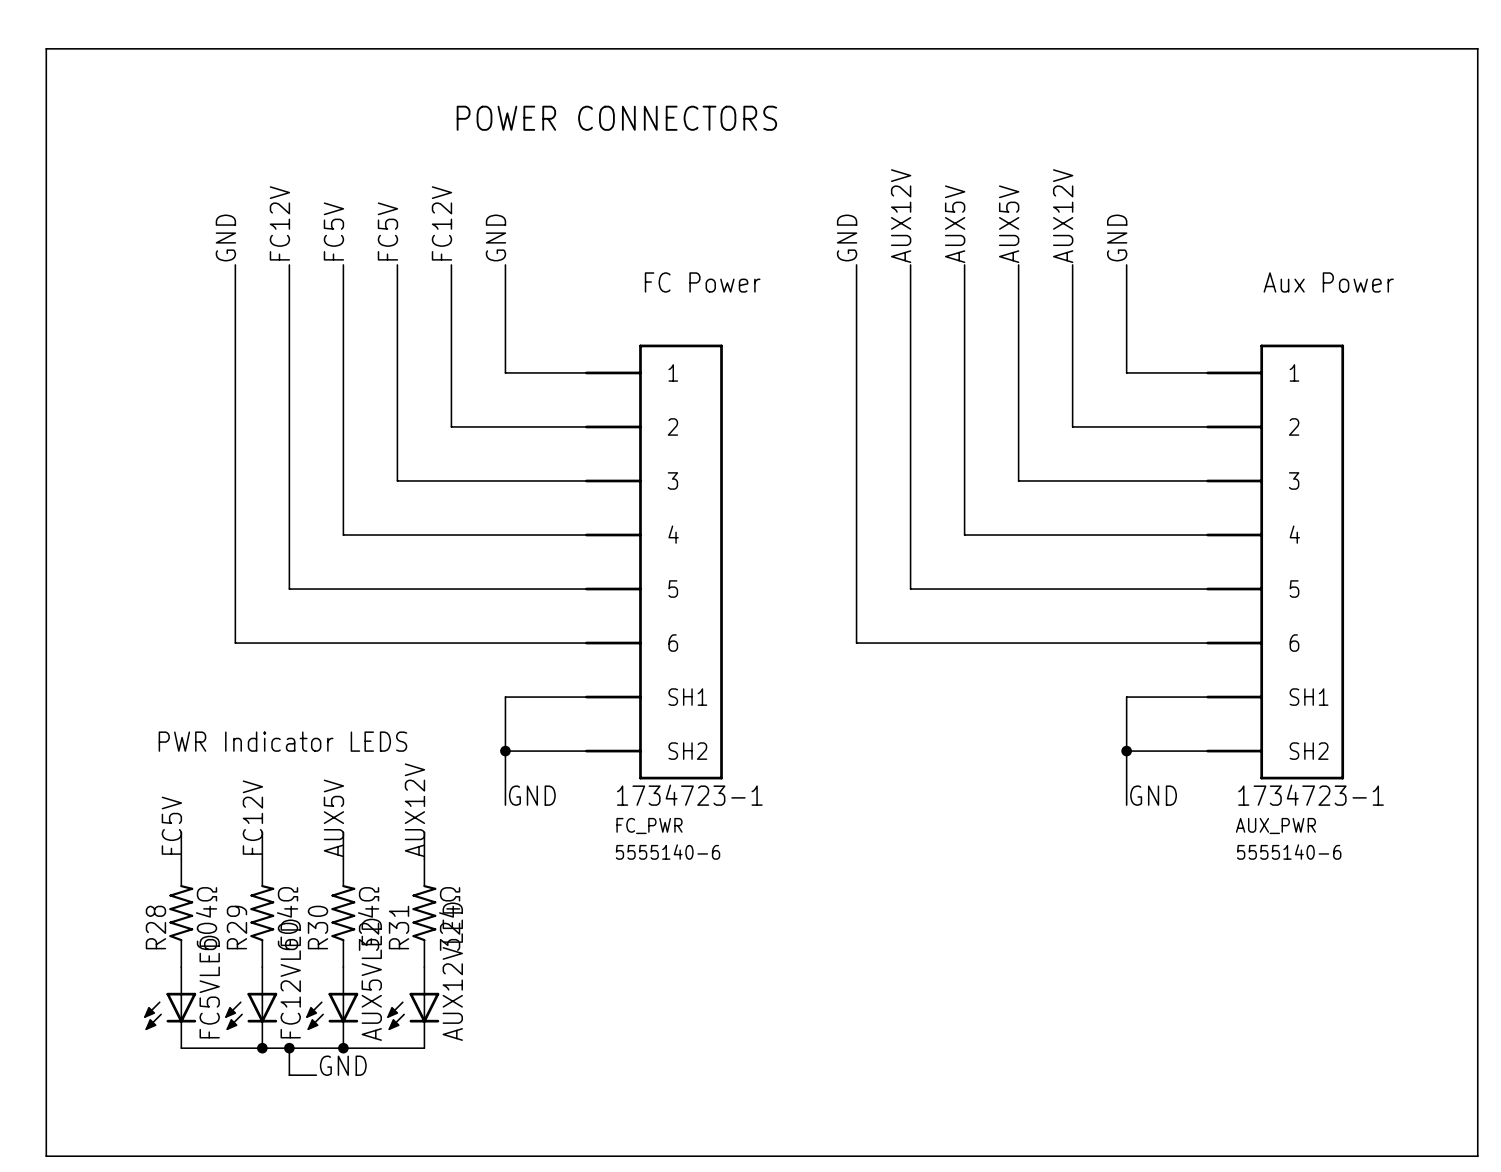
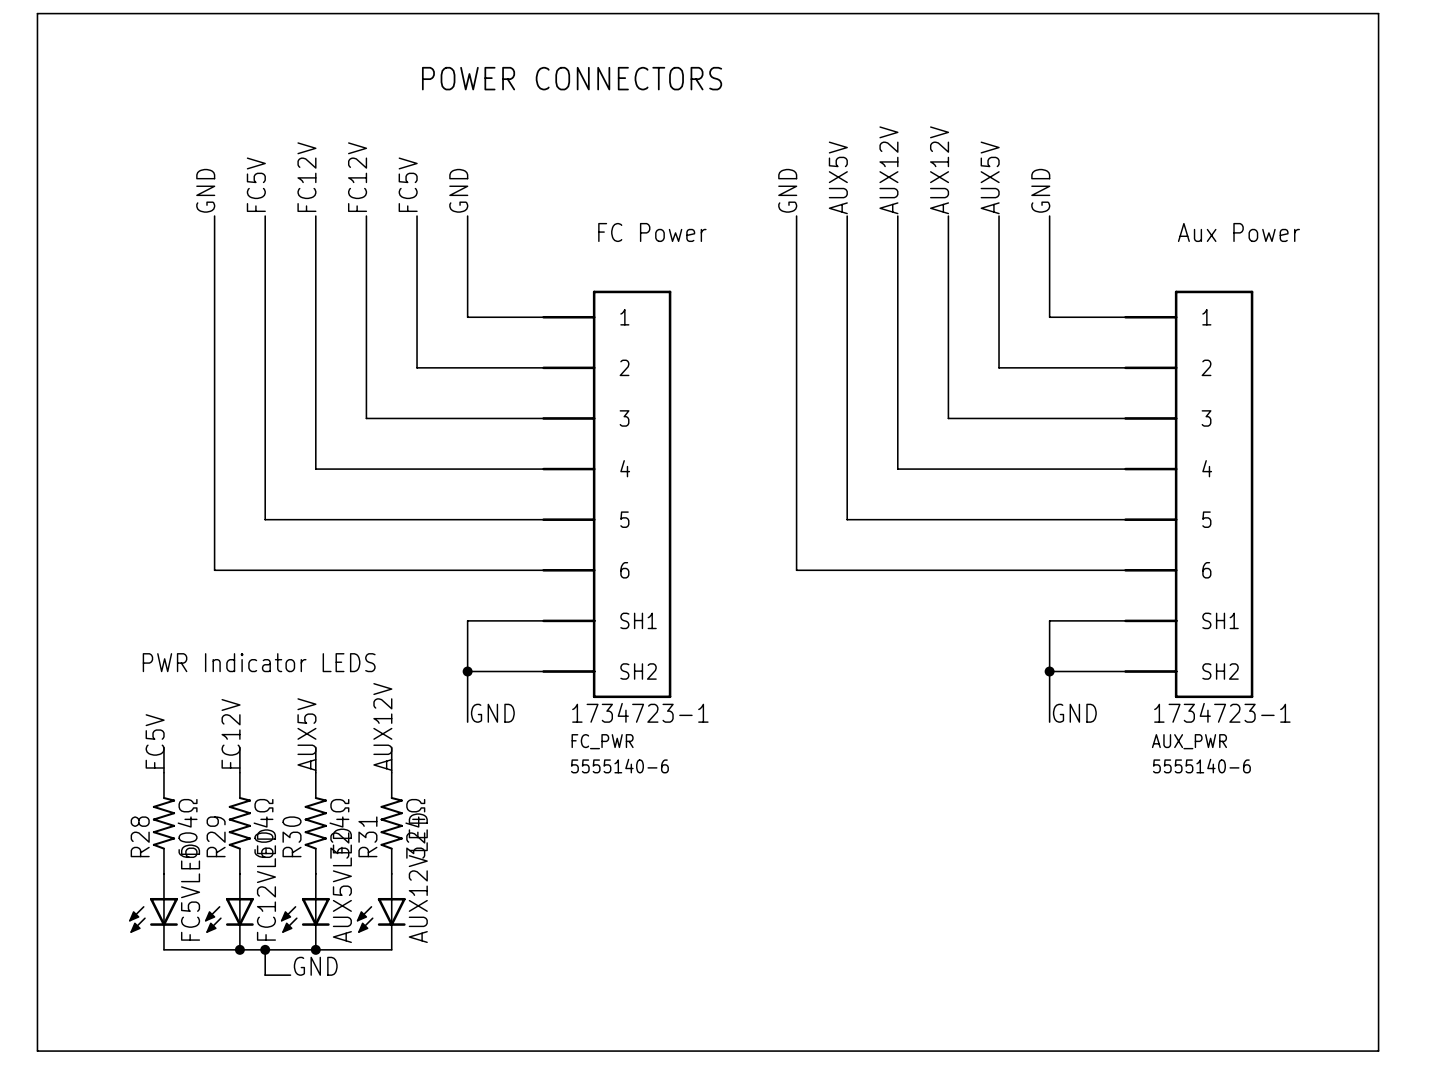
label: AUX12V (901, 216) -> AUX5V (838, 177)
label: AUX12V (1063, 216) -> AUX5V (990, 177)
label: FC12V (279, 223) -> FC5V (256, 184)
label: FC12V (441, 223) -> FC5V (408, 184)
label: AUX5V (955, 224) -> AUX12V (888, 170)
label: AUX5V (1009, 224) -> AUX12V (939, 170)
label: FC5V (333, 231) -> FC12V (306, 177)
label: FC5V (387, 231) -> FC12V (357, 177)

